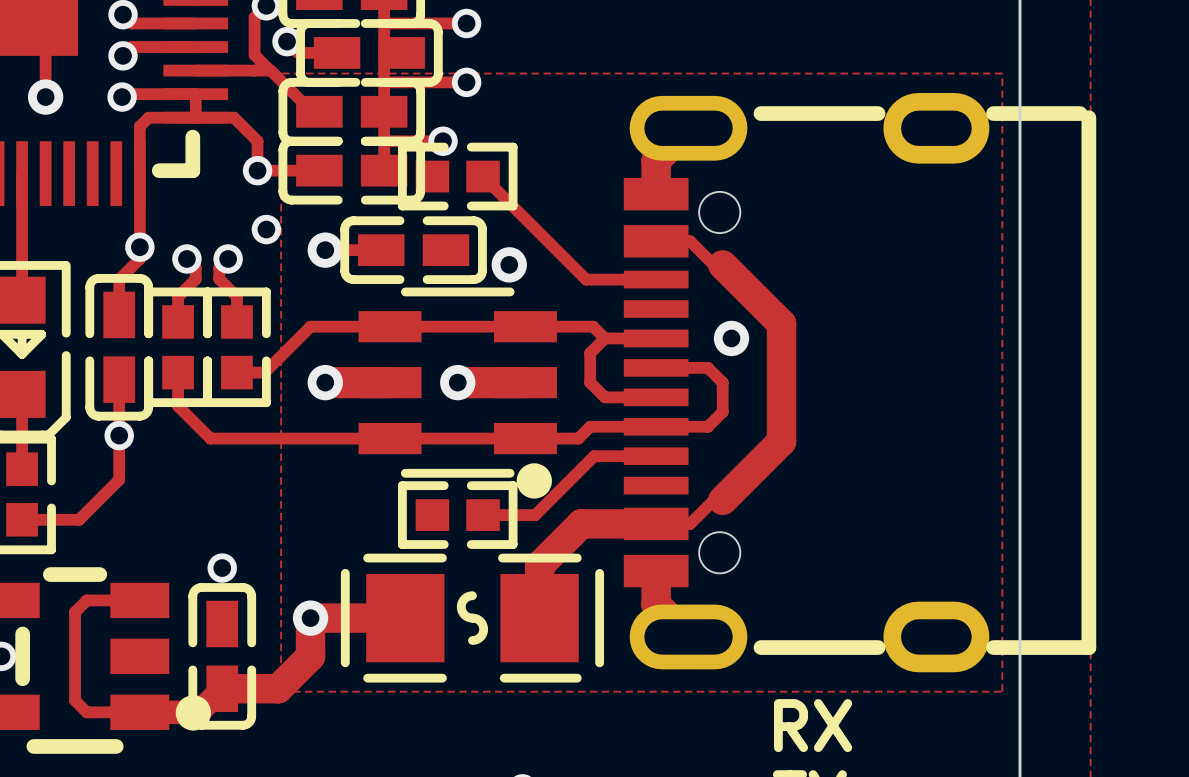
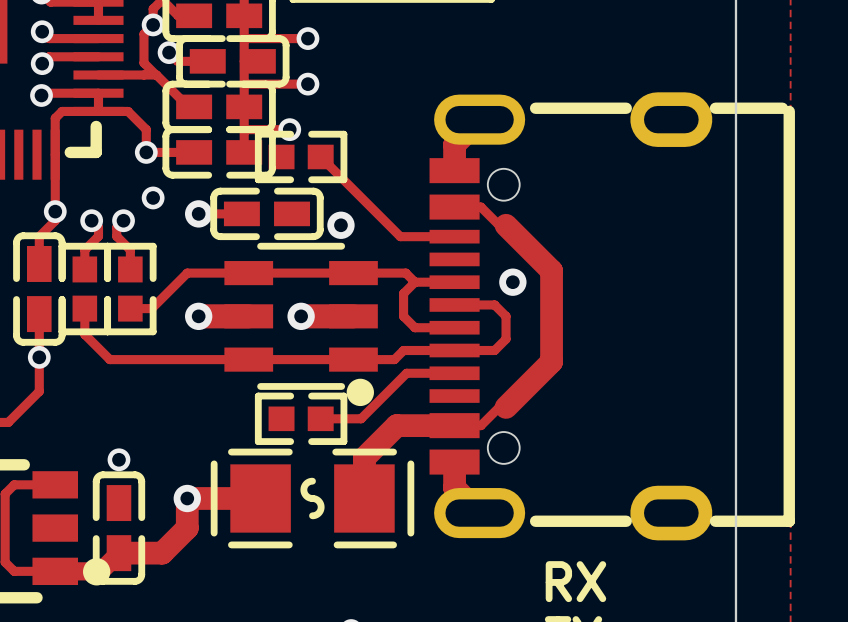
zone outline: (281, 73) (1002, 73) (1002, 691) (281, 691) (281, 73) -> none

